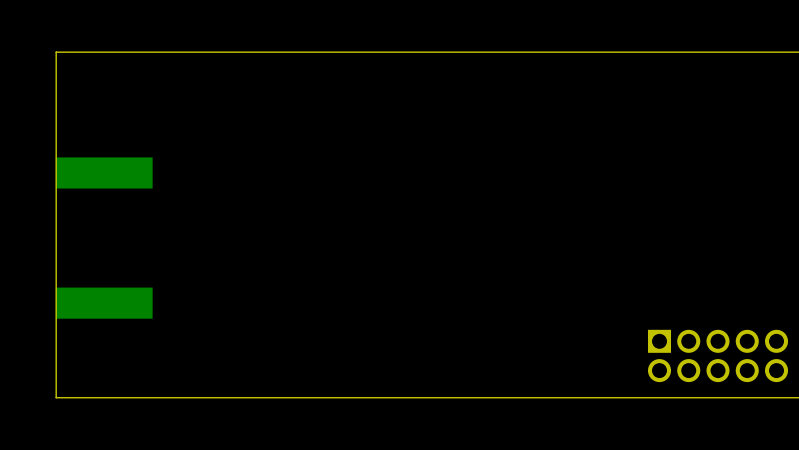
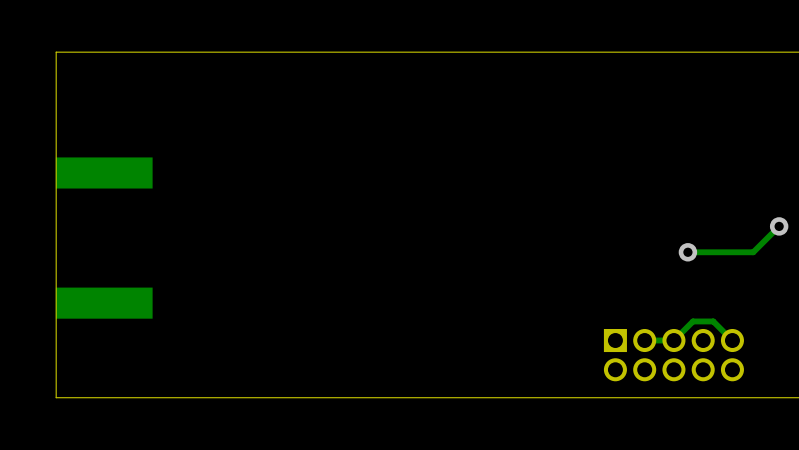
track: none -> (779, 226) (753, 252) (687, 252)
via: none -> (779, 226)
via: none -> (687, 252)
track: none -> (732, 340) (713, 321) (693, 321) (673, 340) (644, 340)
part position: (718, 355) -> (673, 355)

